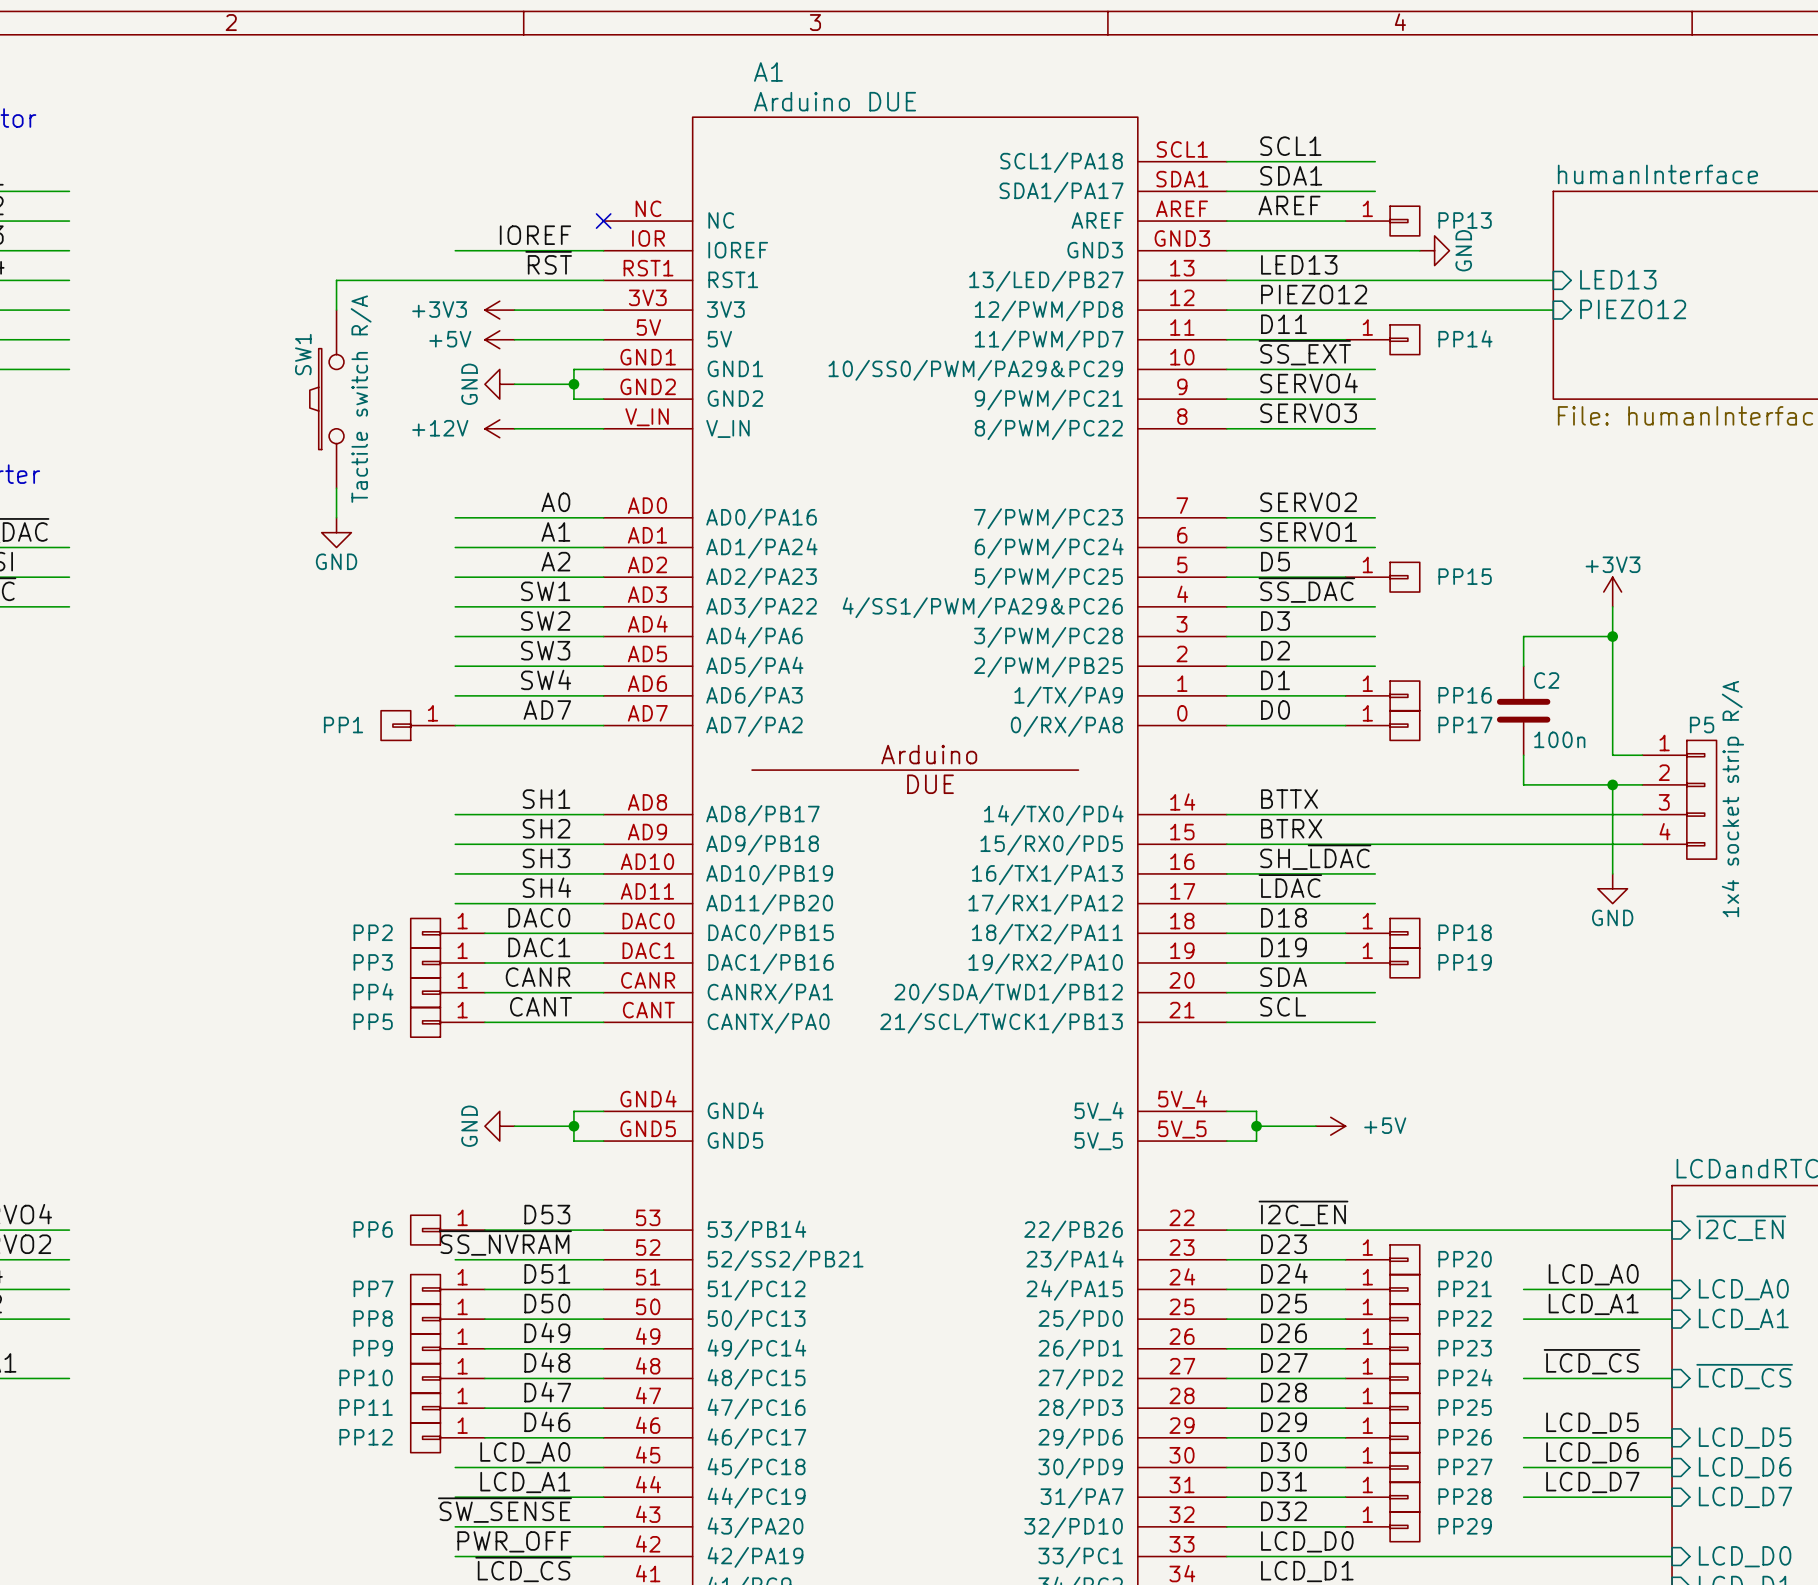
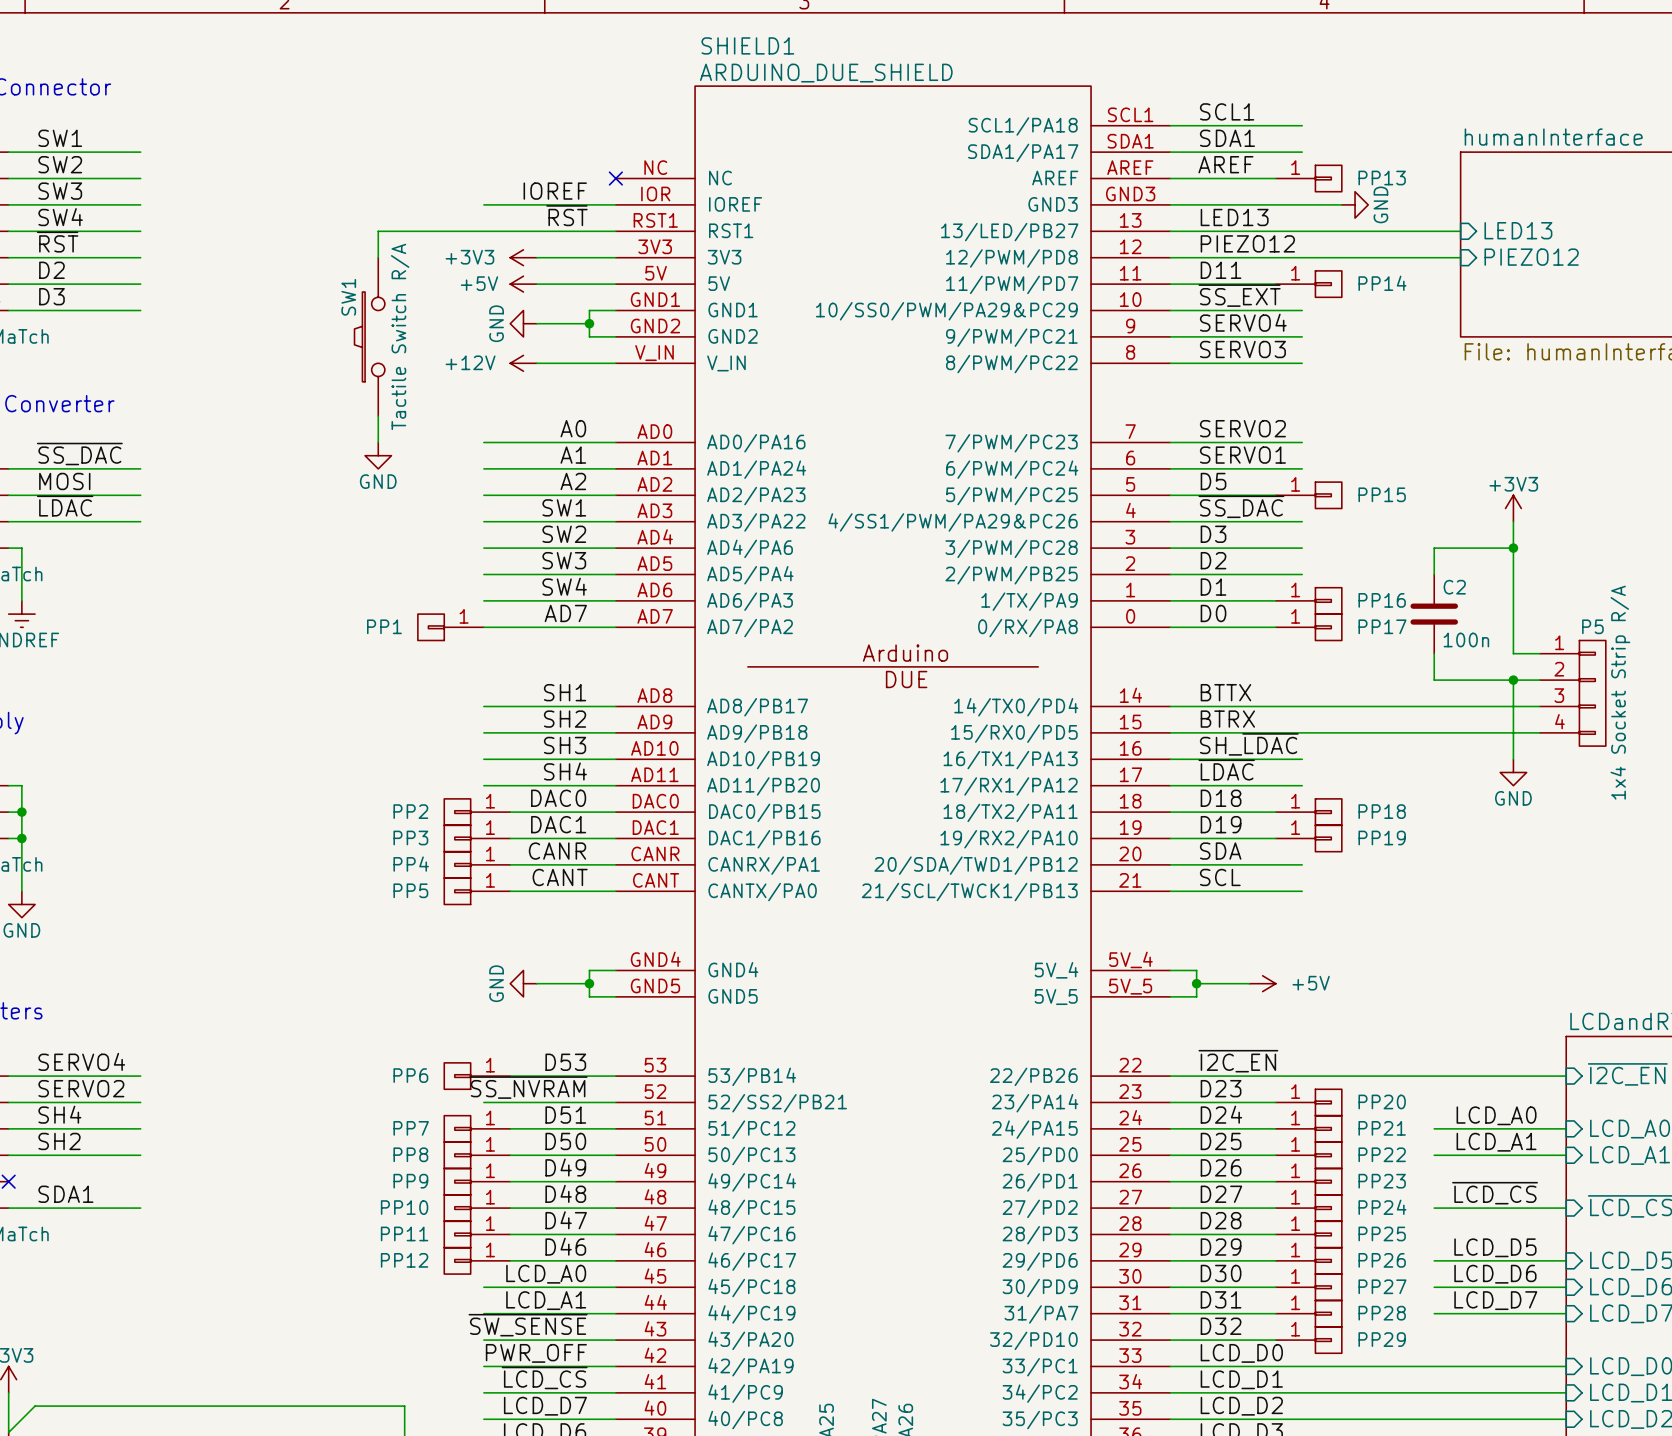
A1 name: A1 (768, 71) -> SHIELD1 (747, 45)
A1 value: Arduino DUE (835, 101) -> ARDUINO_DUE_SHIELD (826, 73)
SW1 value: Tactile switch R/A (361, 399) -> Tactile Switch R/A (400, 336)
P5 value: 1x4 socket strip R/A (1732, 799) -> 1x4 Socket Strip R/A (1620, 692)

